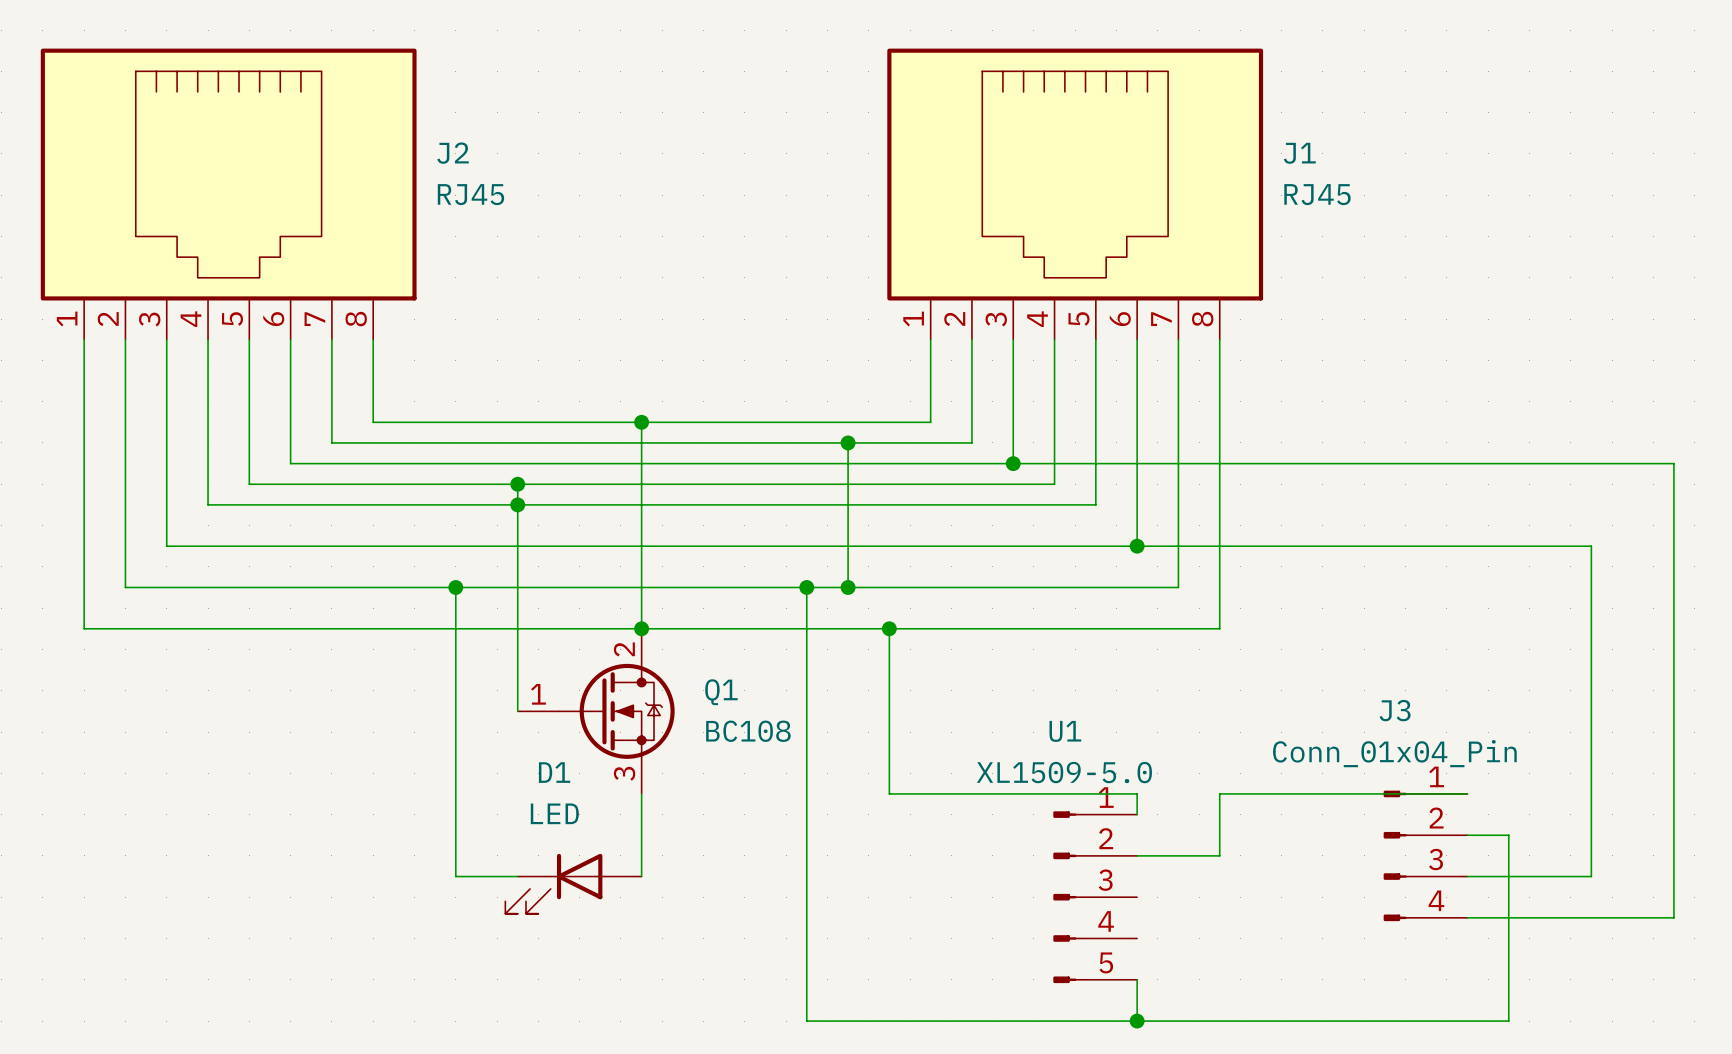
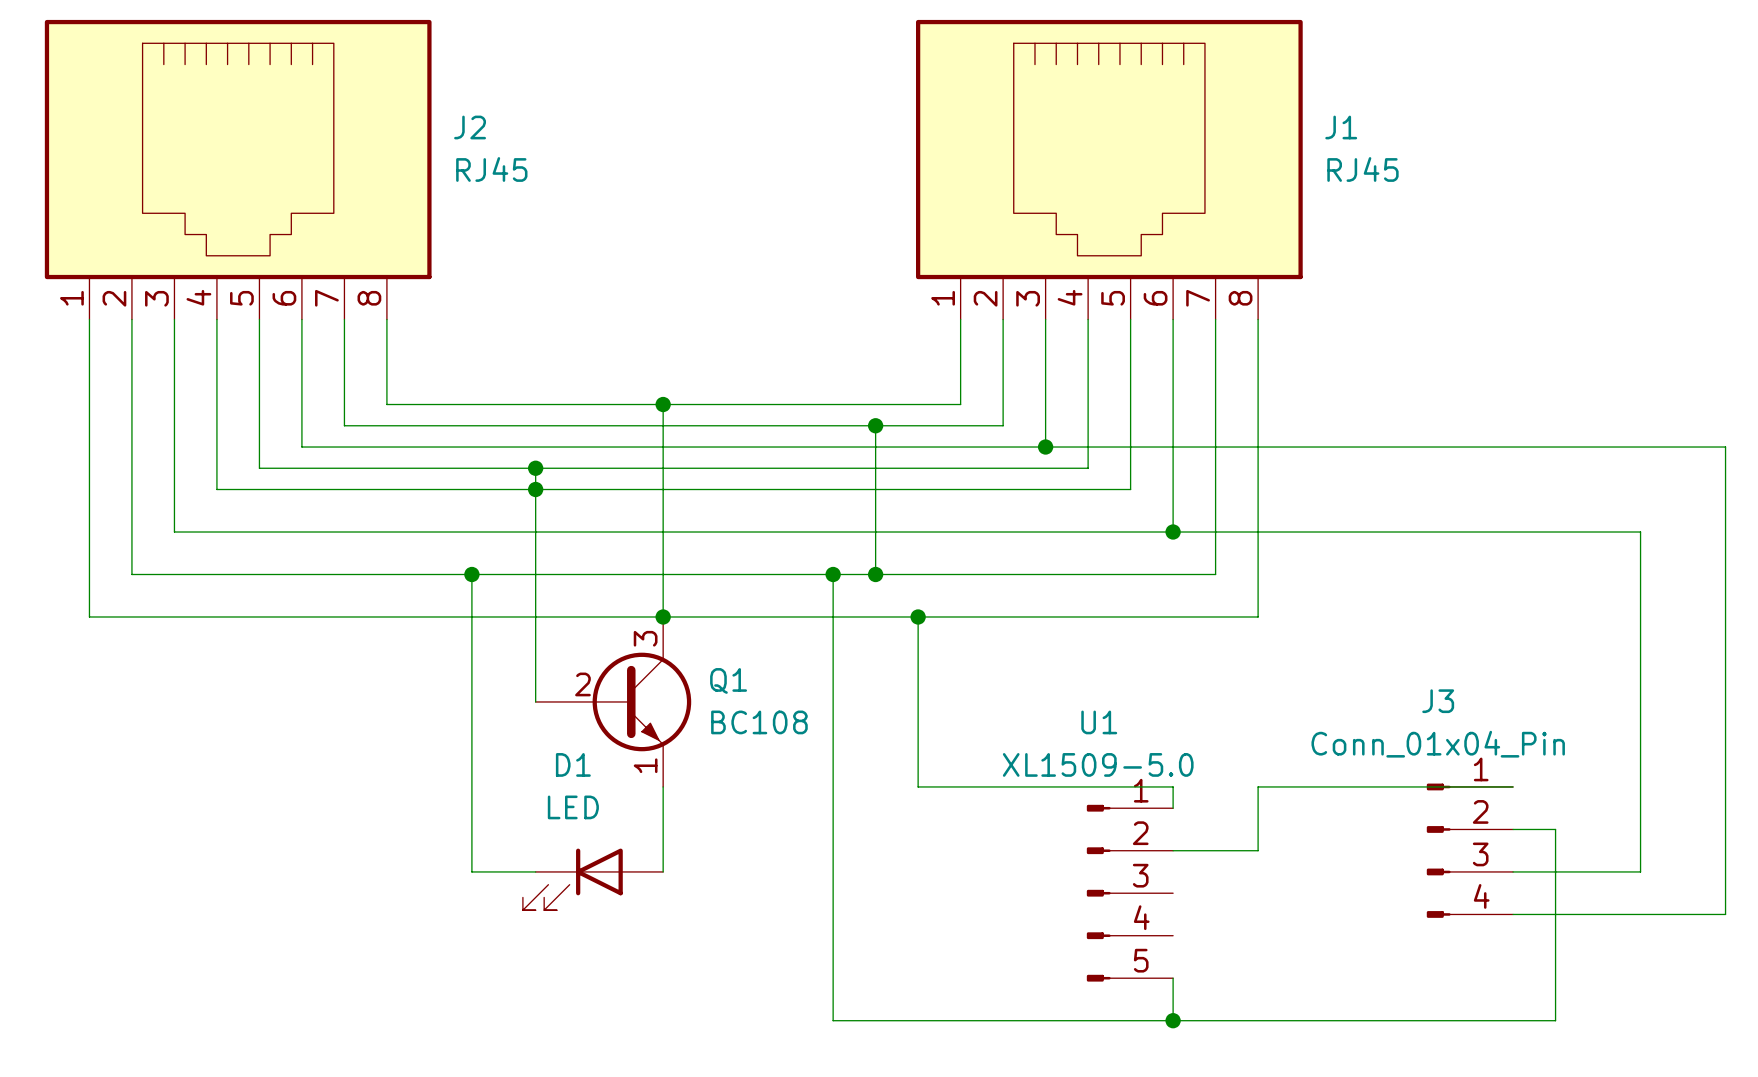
Q1 symbol: [517, 628, 675, 794] -> [535, 616, 692, 787]

